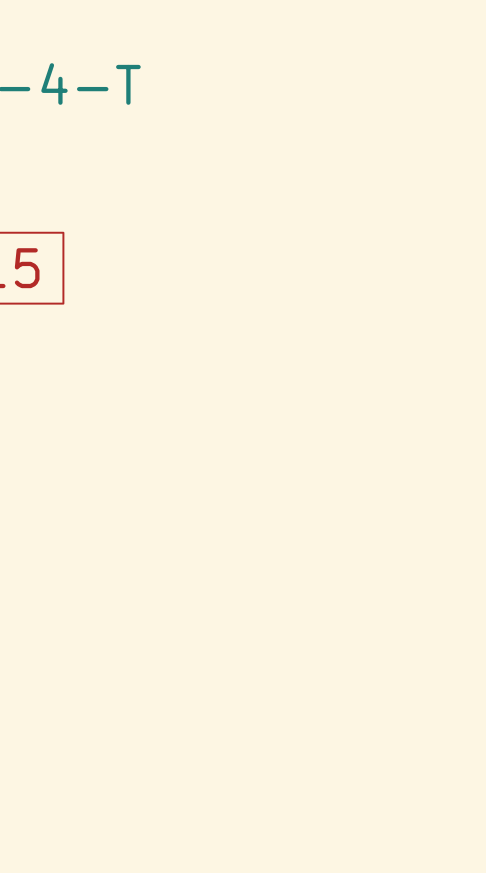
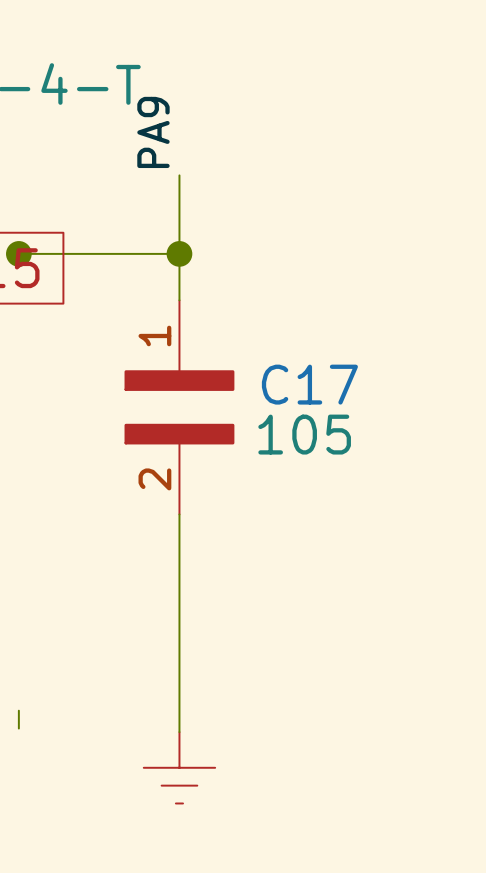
label: none -> PA9 (153, 132)
wire: none -> (179, 175) (179, 300)
wire: none -> (18, 253) (179, 253)
junction: none -> (18, 253)
junction: none -> (179, 253)
C17: none -> 105 (179, 407)
wire: none -> (179, 514) (179, 732)
wire: none -> (18, 710) (18, 728)
power symbol: none -> (179, 767)

